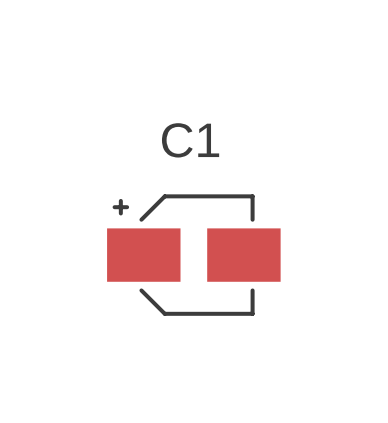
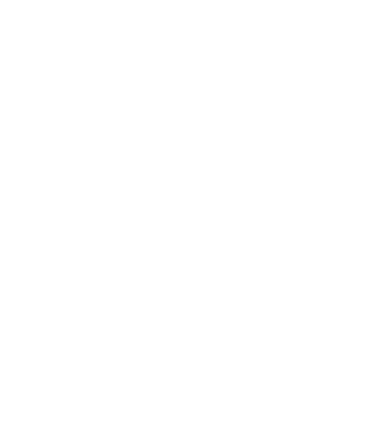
C1: (193, 255) -> none

